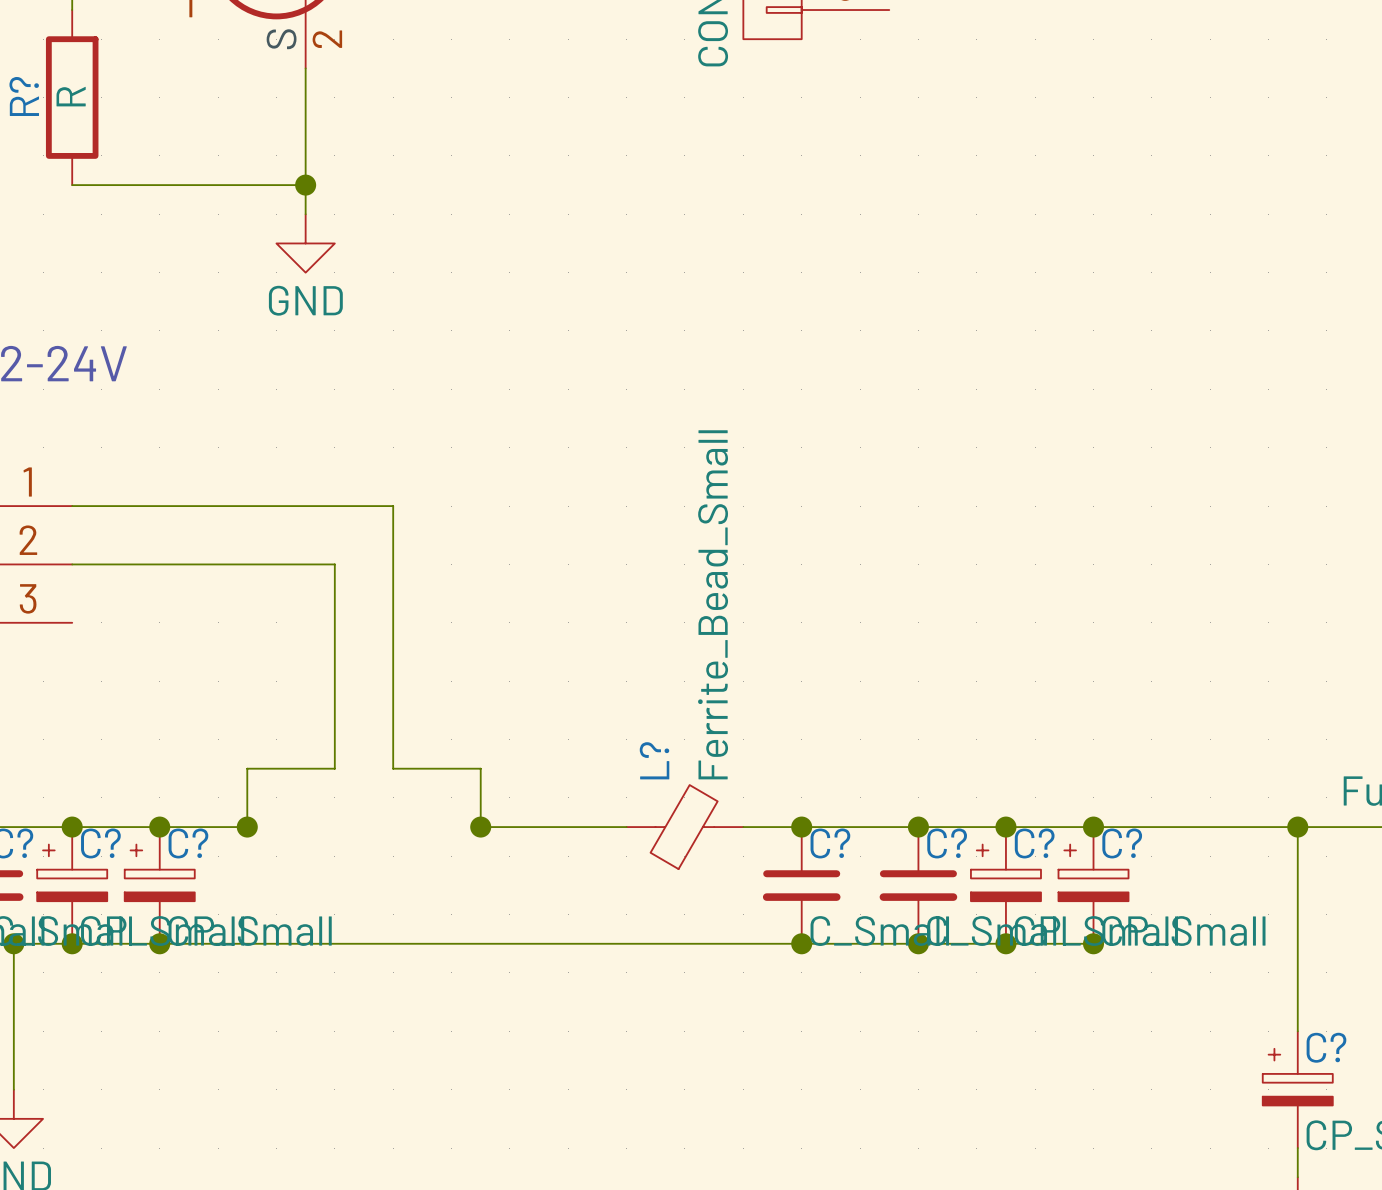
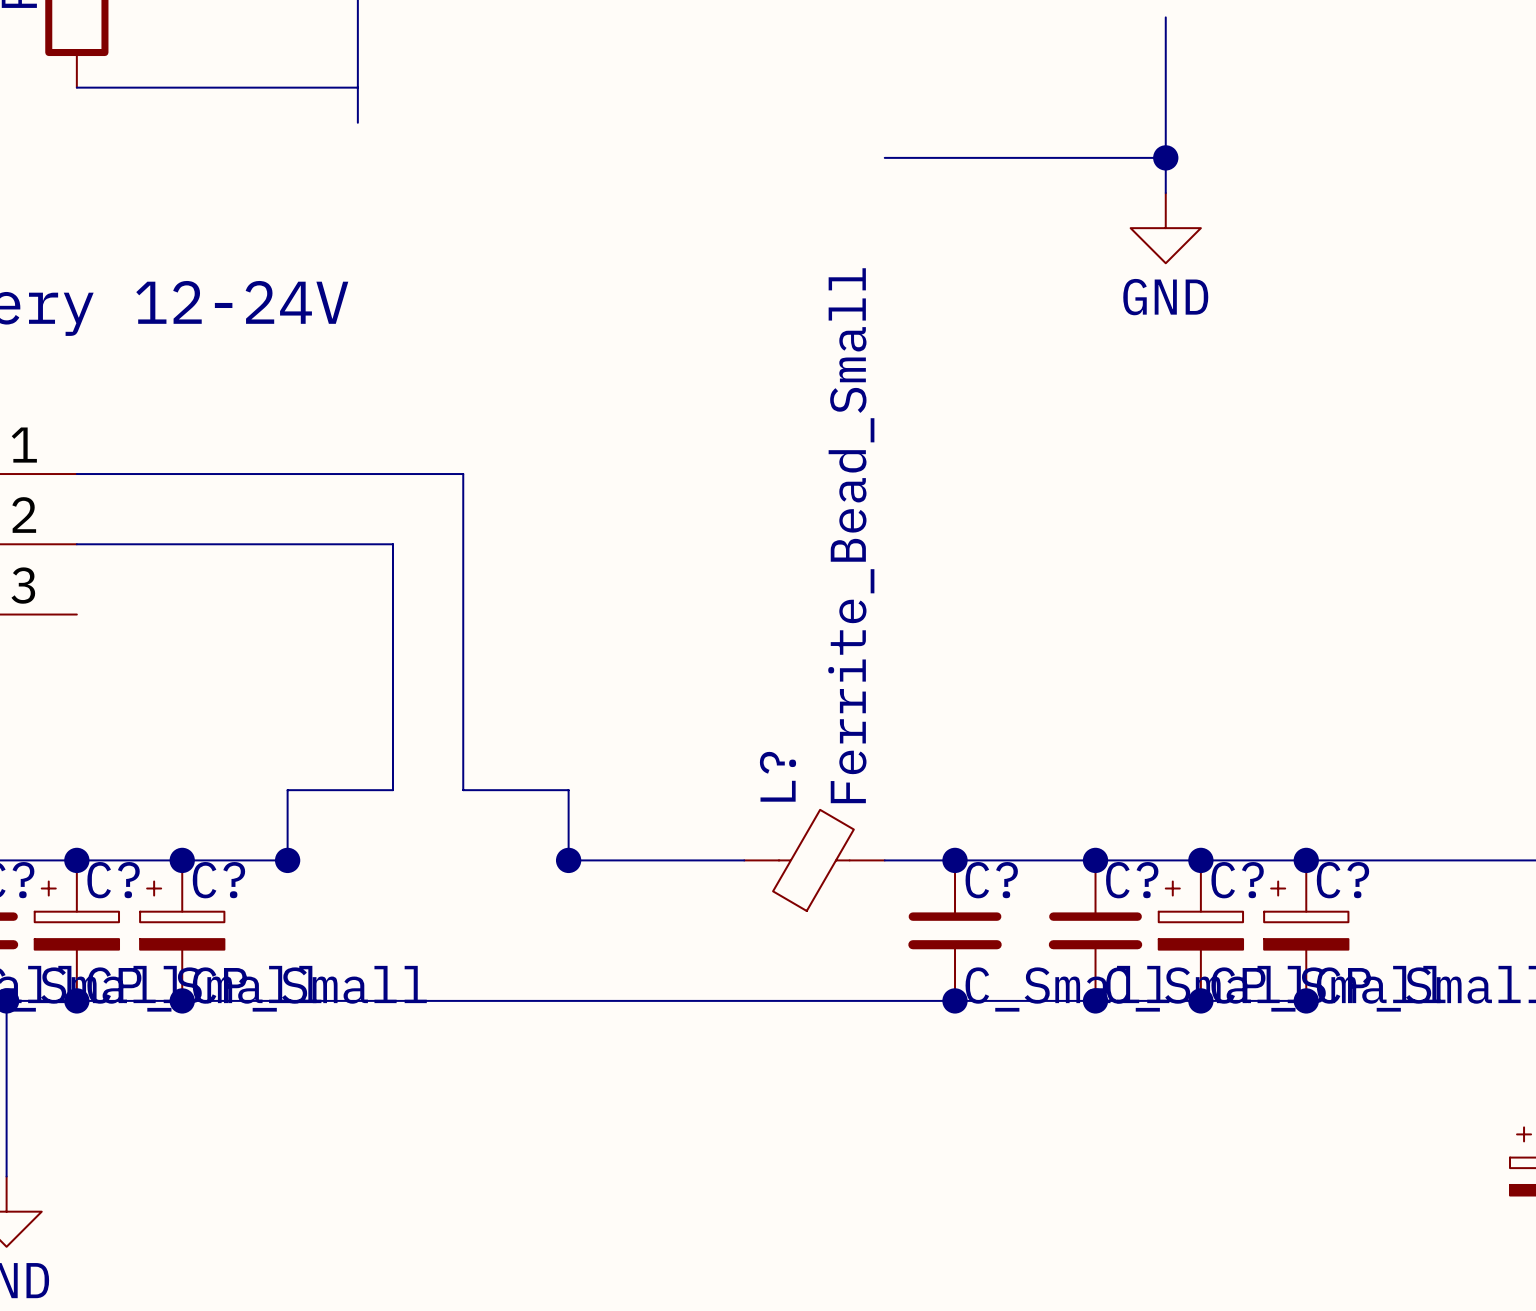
wire: none -> (1165, 17) (1165, 193)
junction: (305, 185) -> none
power symbol: GND (305, 243) -> none
wire: none -> (884, 157) (1165, 157)
junction: none -> (1165, 157)
power symbol: none -> GND (1165, 228)

